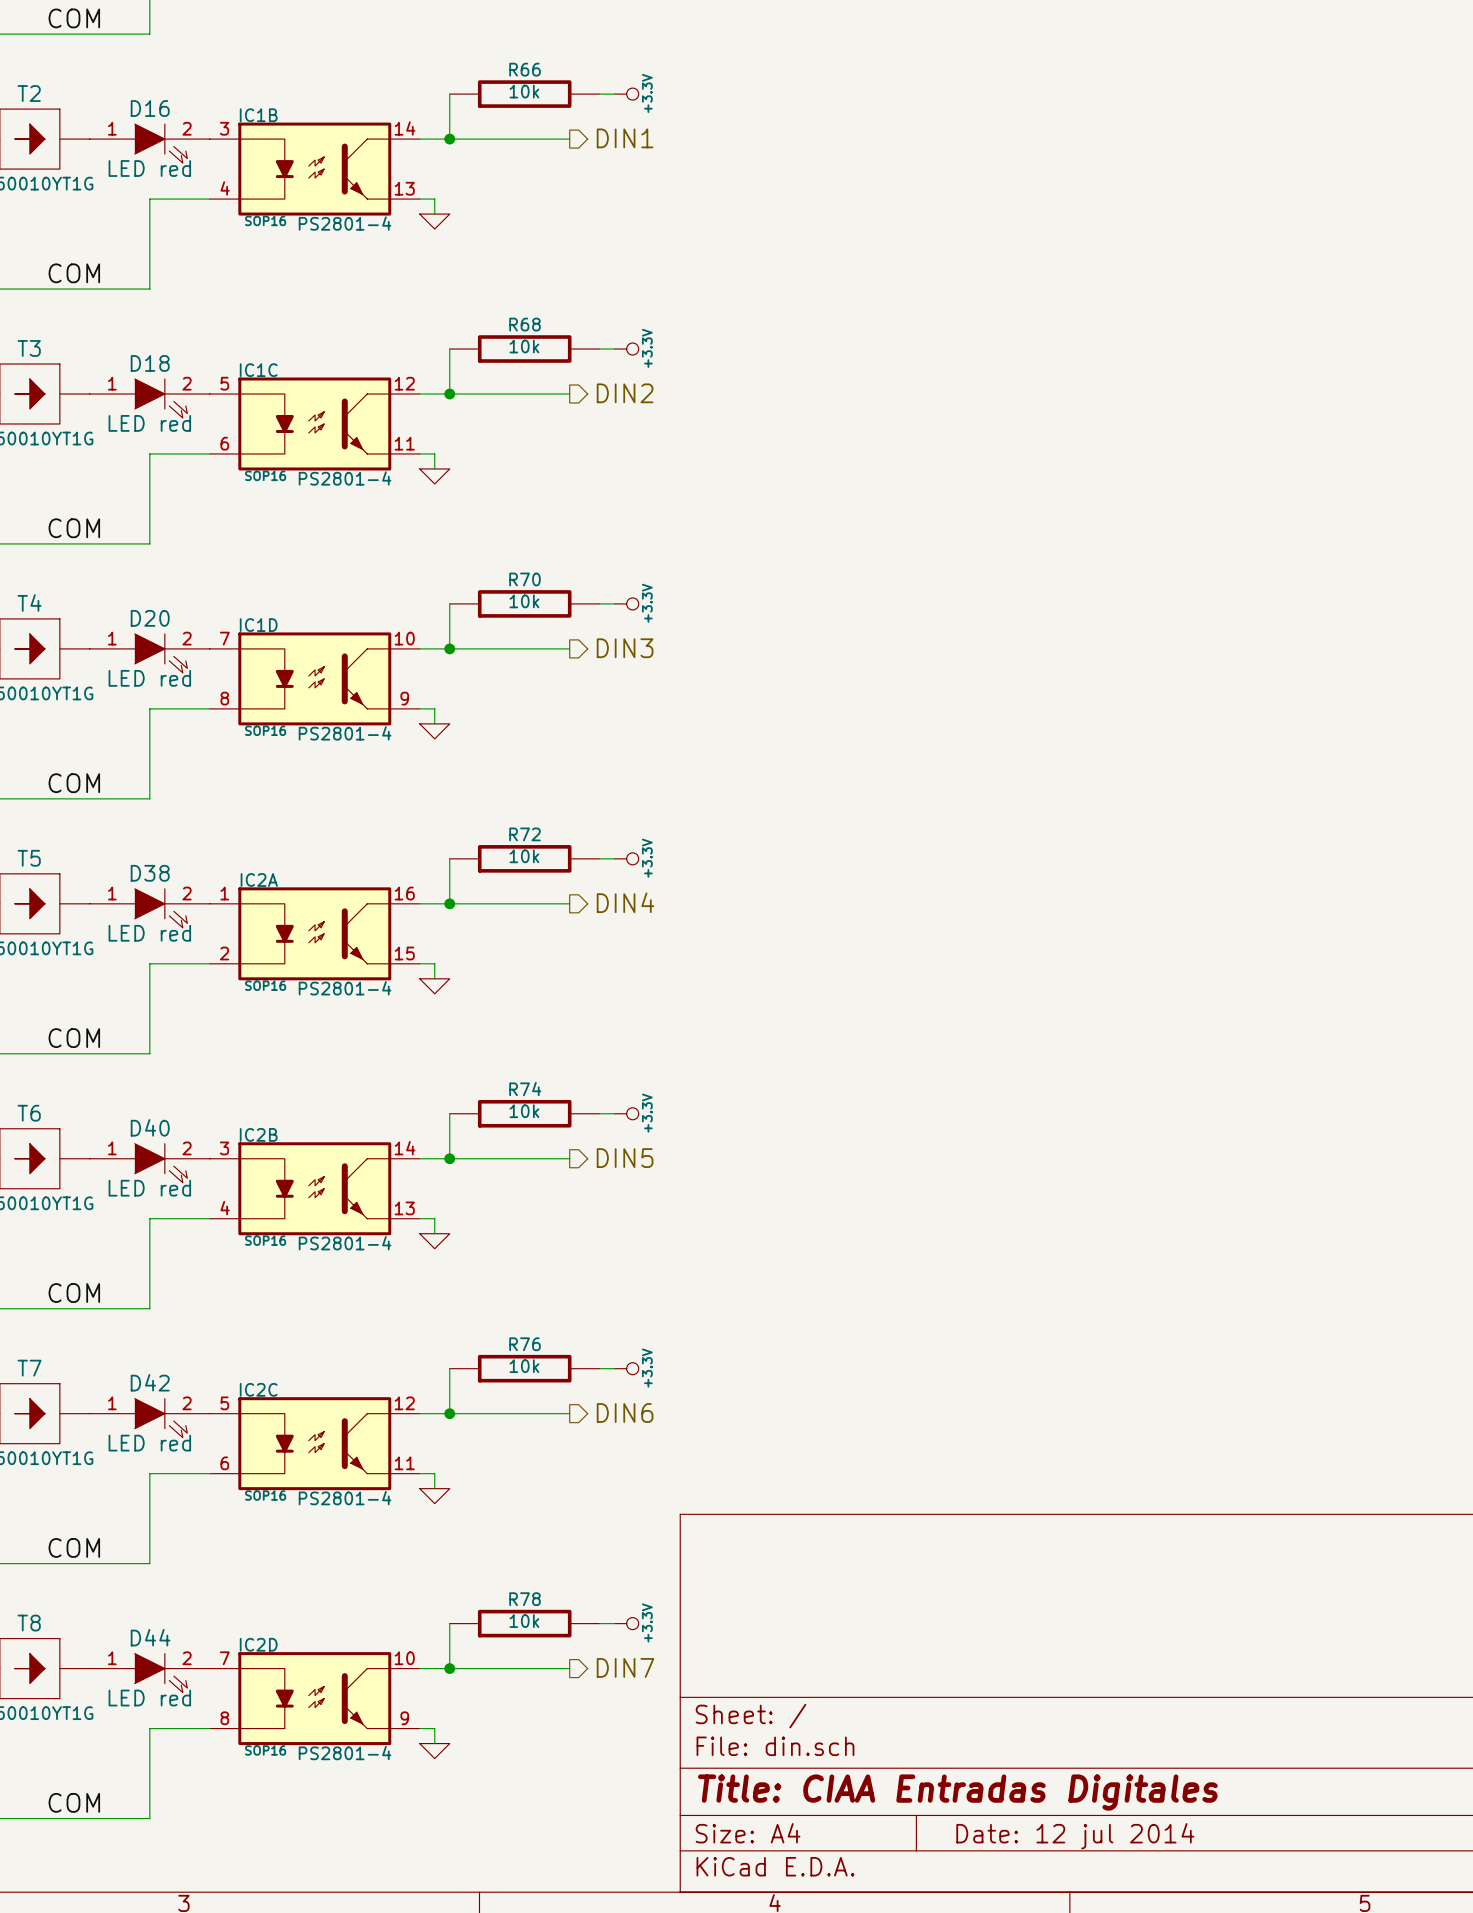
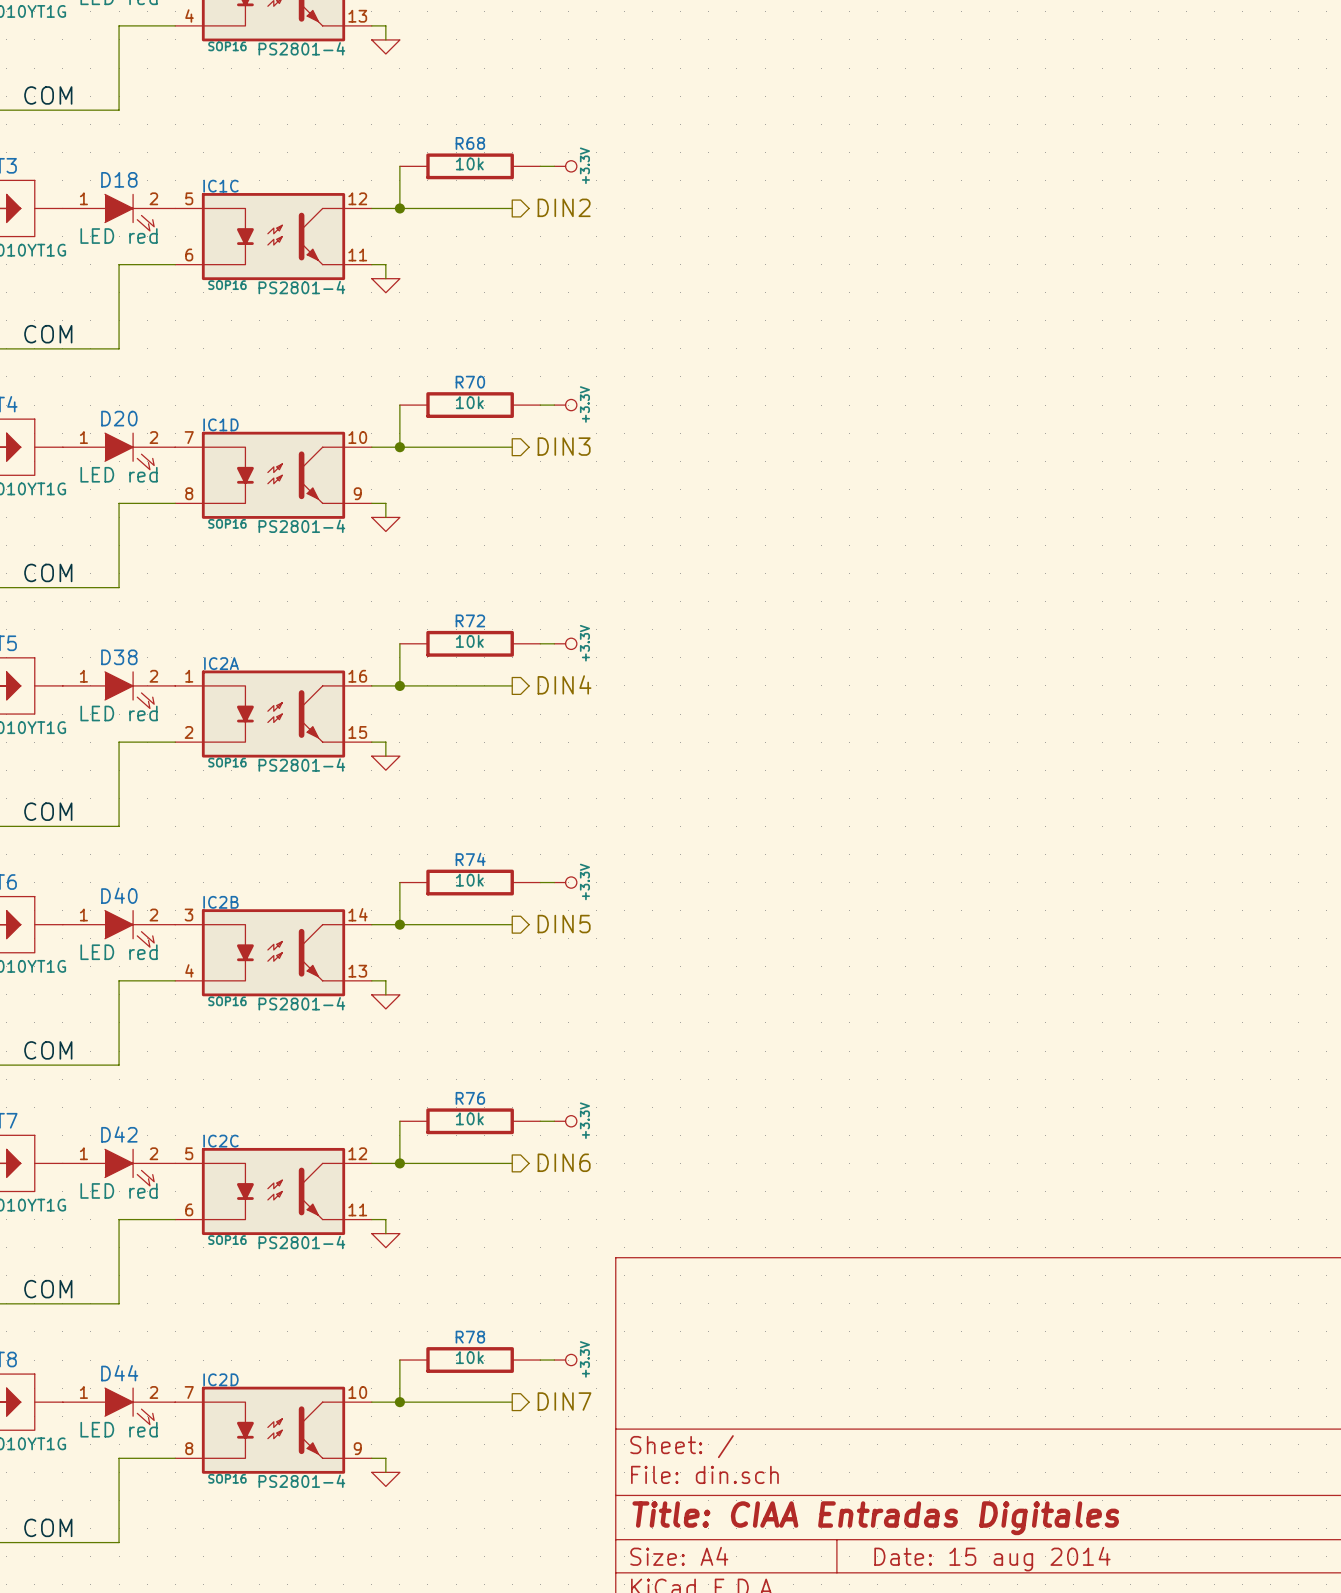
title block: Date: 12 jul 2014 (1075, 1836) -> Date: 15 aug 2014 (992, 1559)

